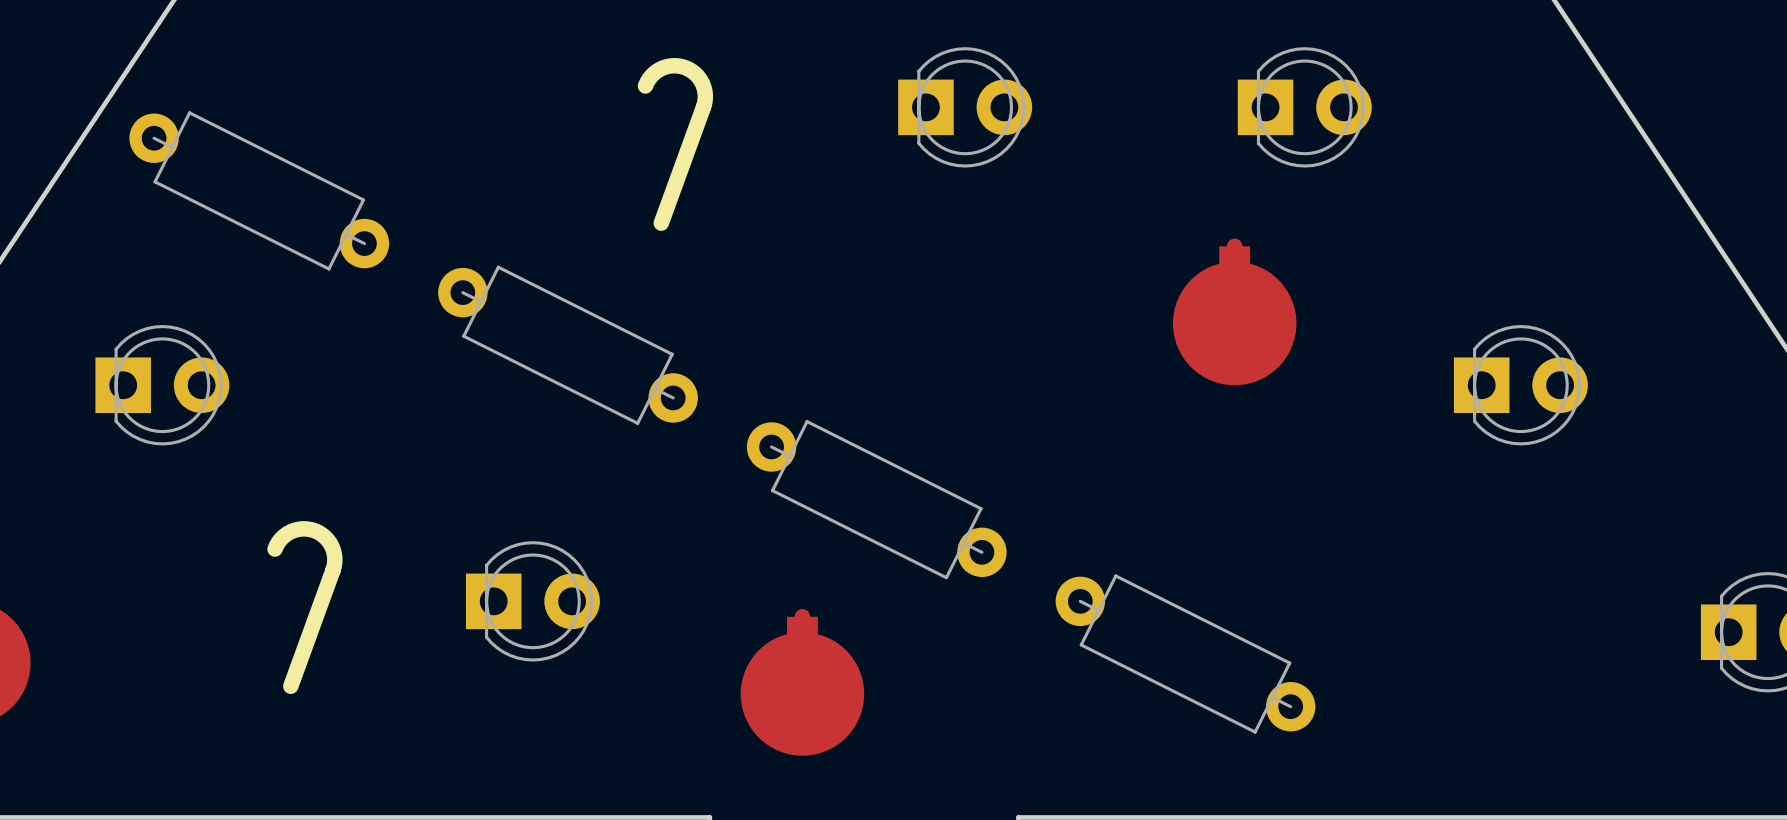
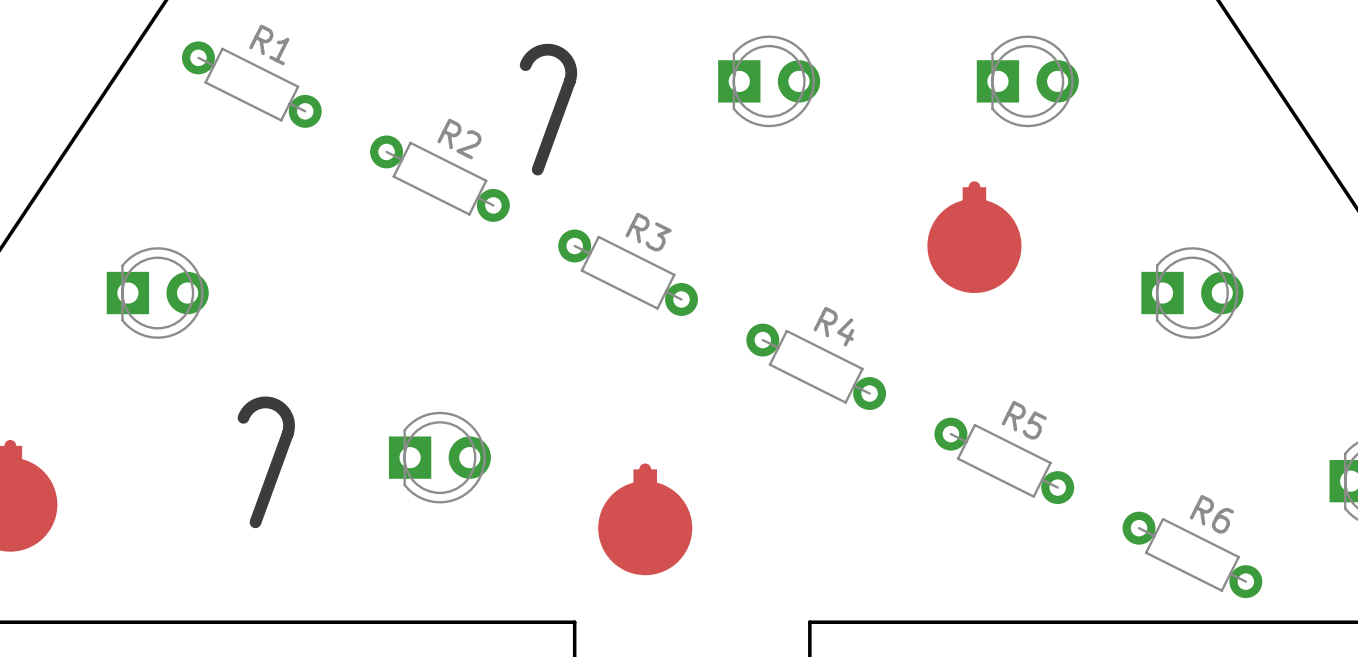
R1: none -> (251, 84)
part: (259, 190) -> none
R2: none -> (439, 178)
part: (568, 345) -> none
R3: none -> (628, 272)
R4: none -> (816, 366)
part: (876, 499) -> none
R5: none -> (1004, 460)
part: (1185, 654) -> none
R6: none -> (1192, 554)

